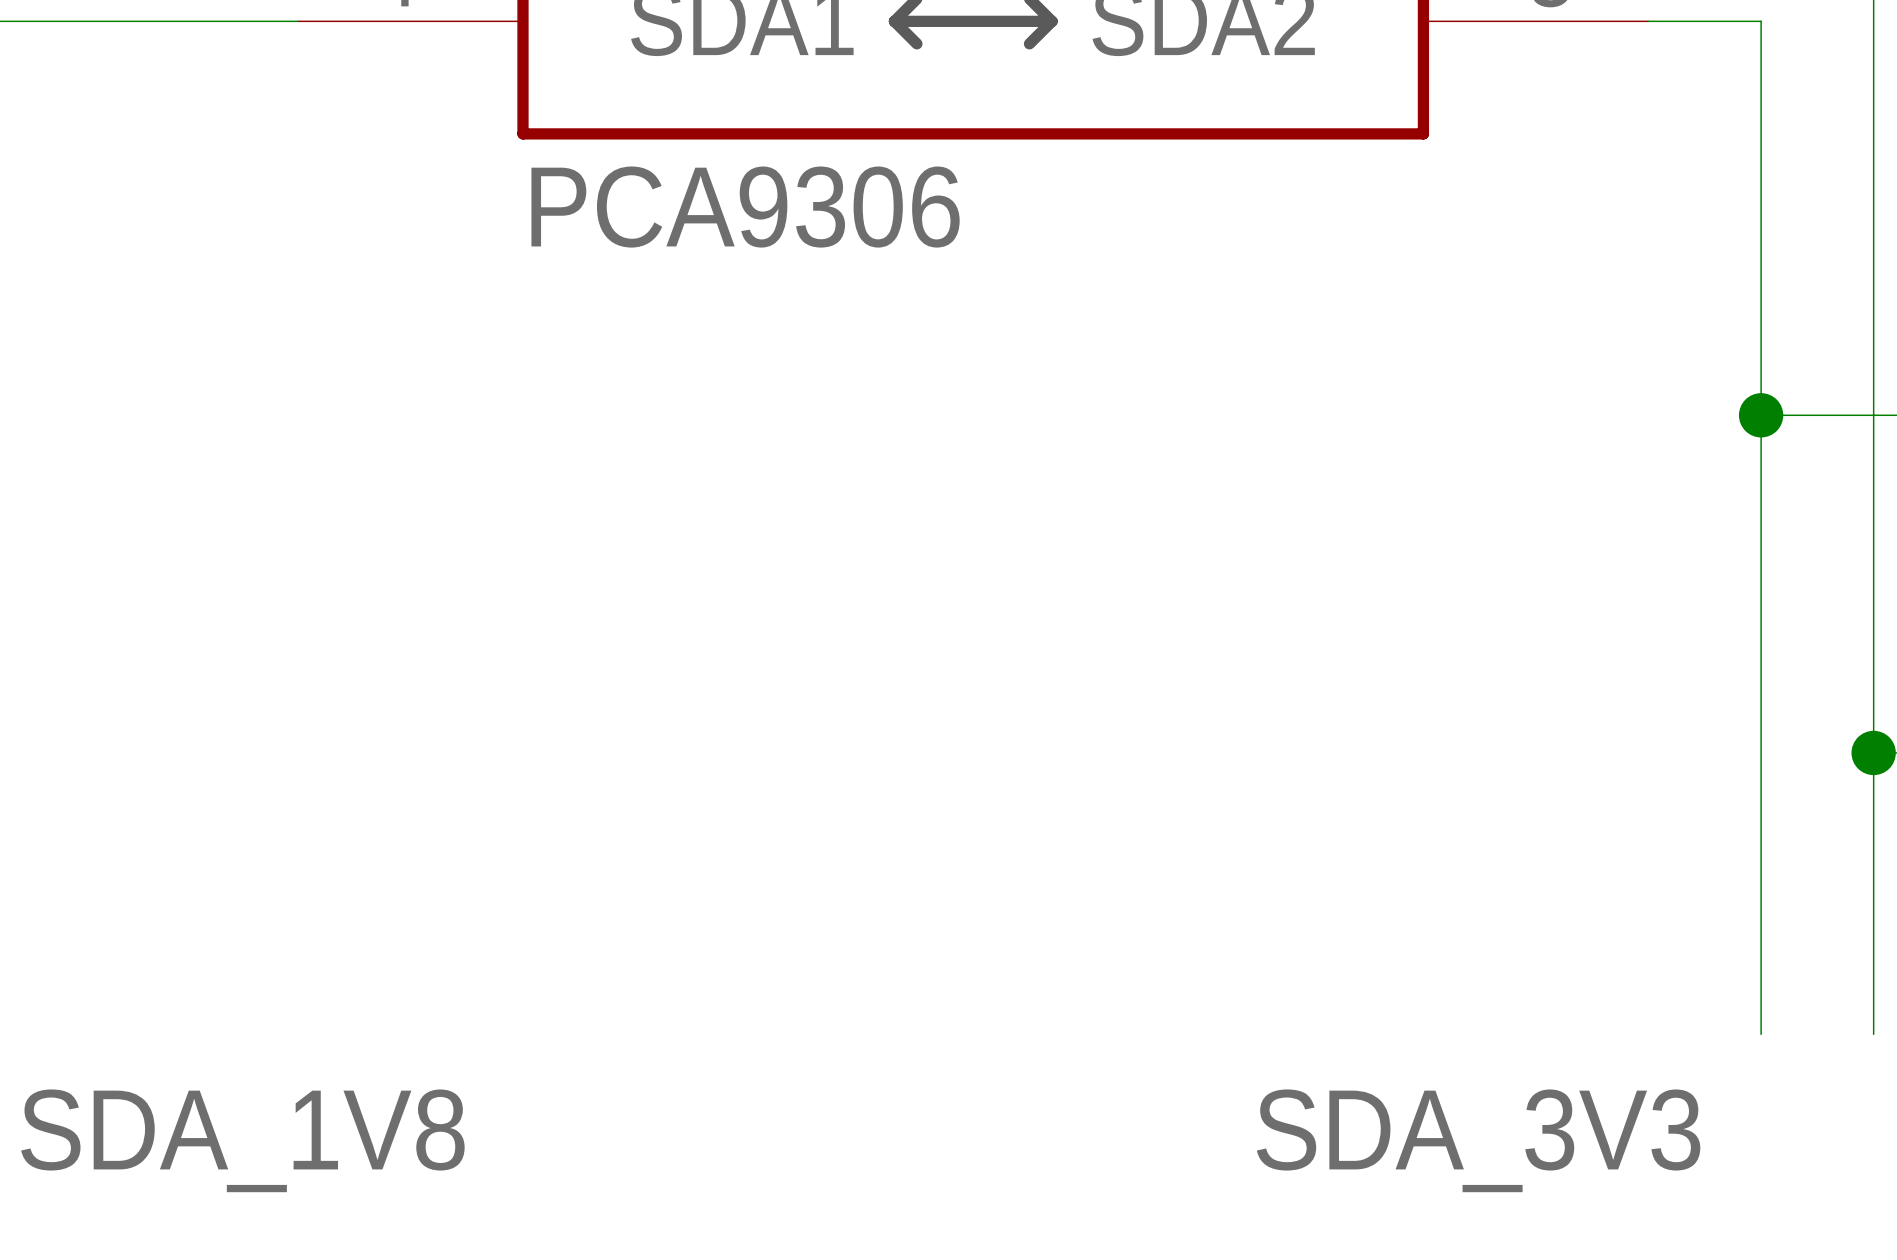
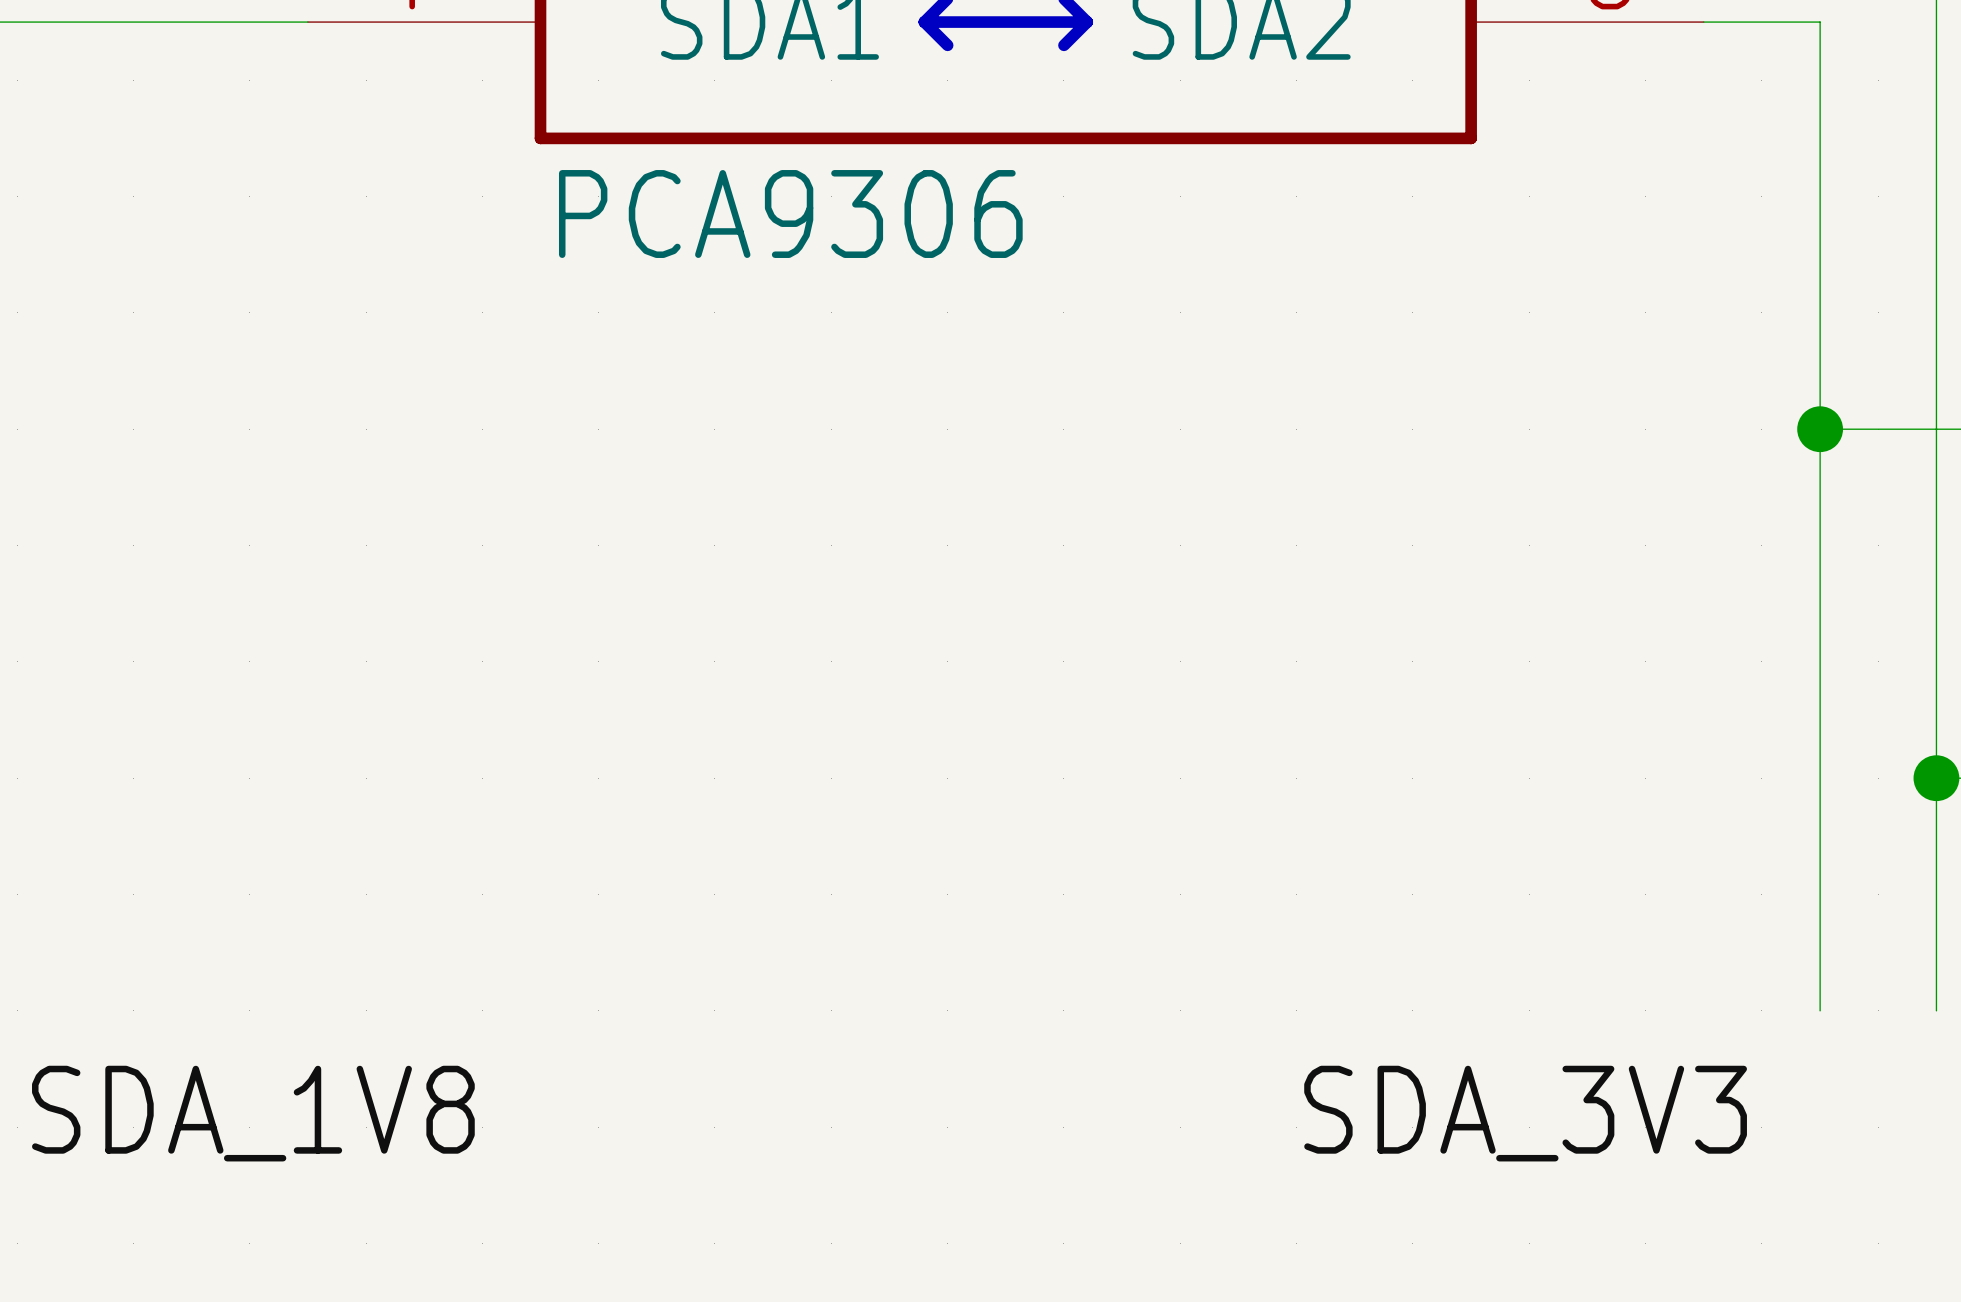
wire: (1761, 978) (1761, 1034) -> none
wire: (1873, 978) (1873, 1034) -> none
label position: SDA_1V8 (242, 1140) -> SDA_1V8 (253, 1113)
label position: SDA_3V3 (1478, 1140) -> SDA_3V3 (1525, 1113)

